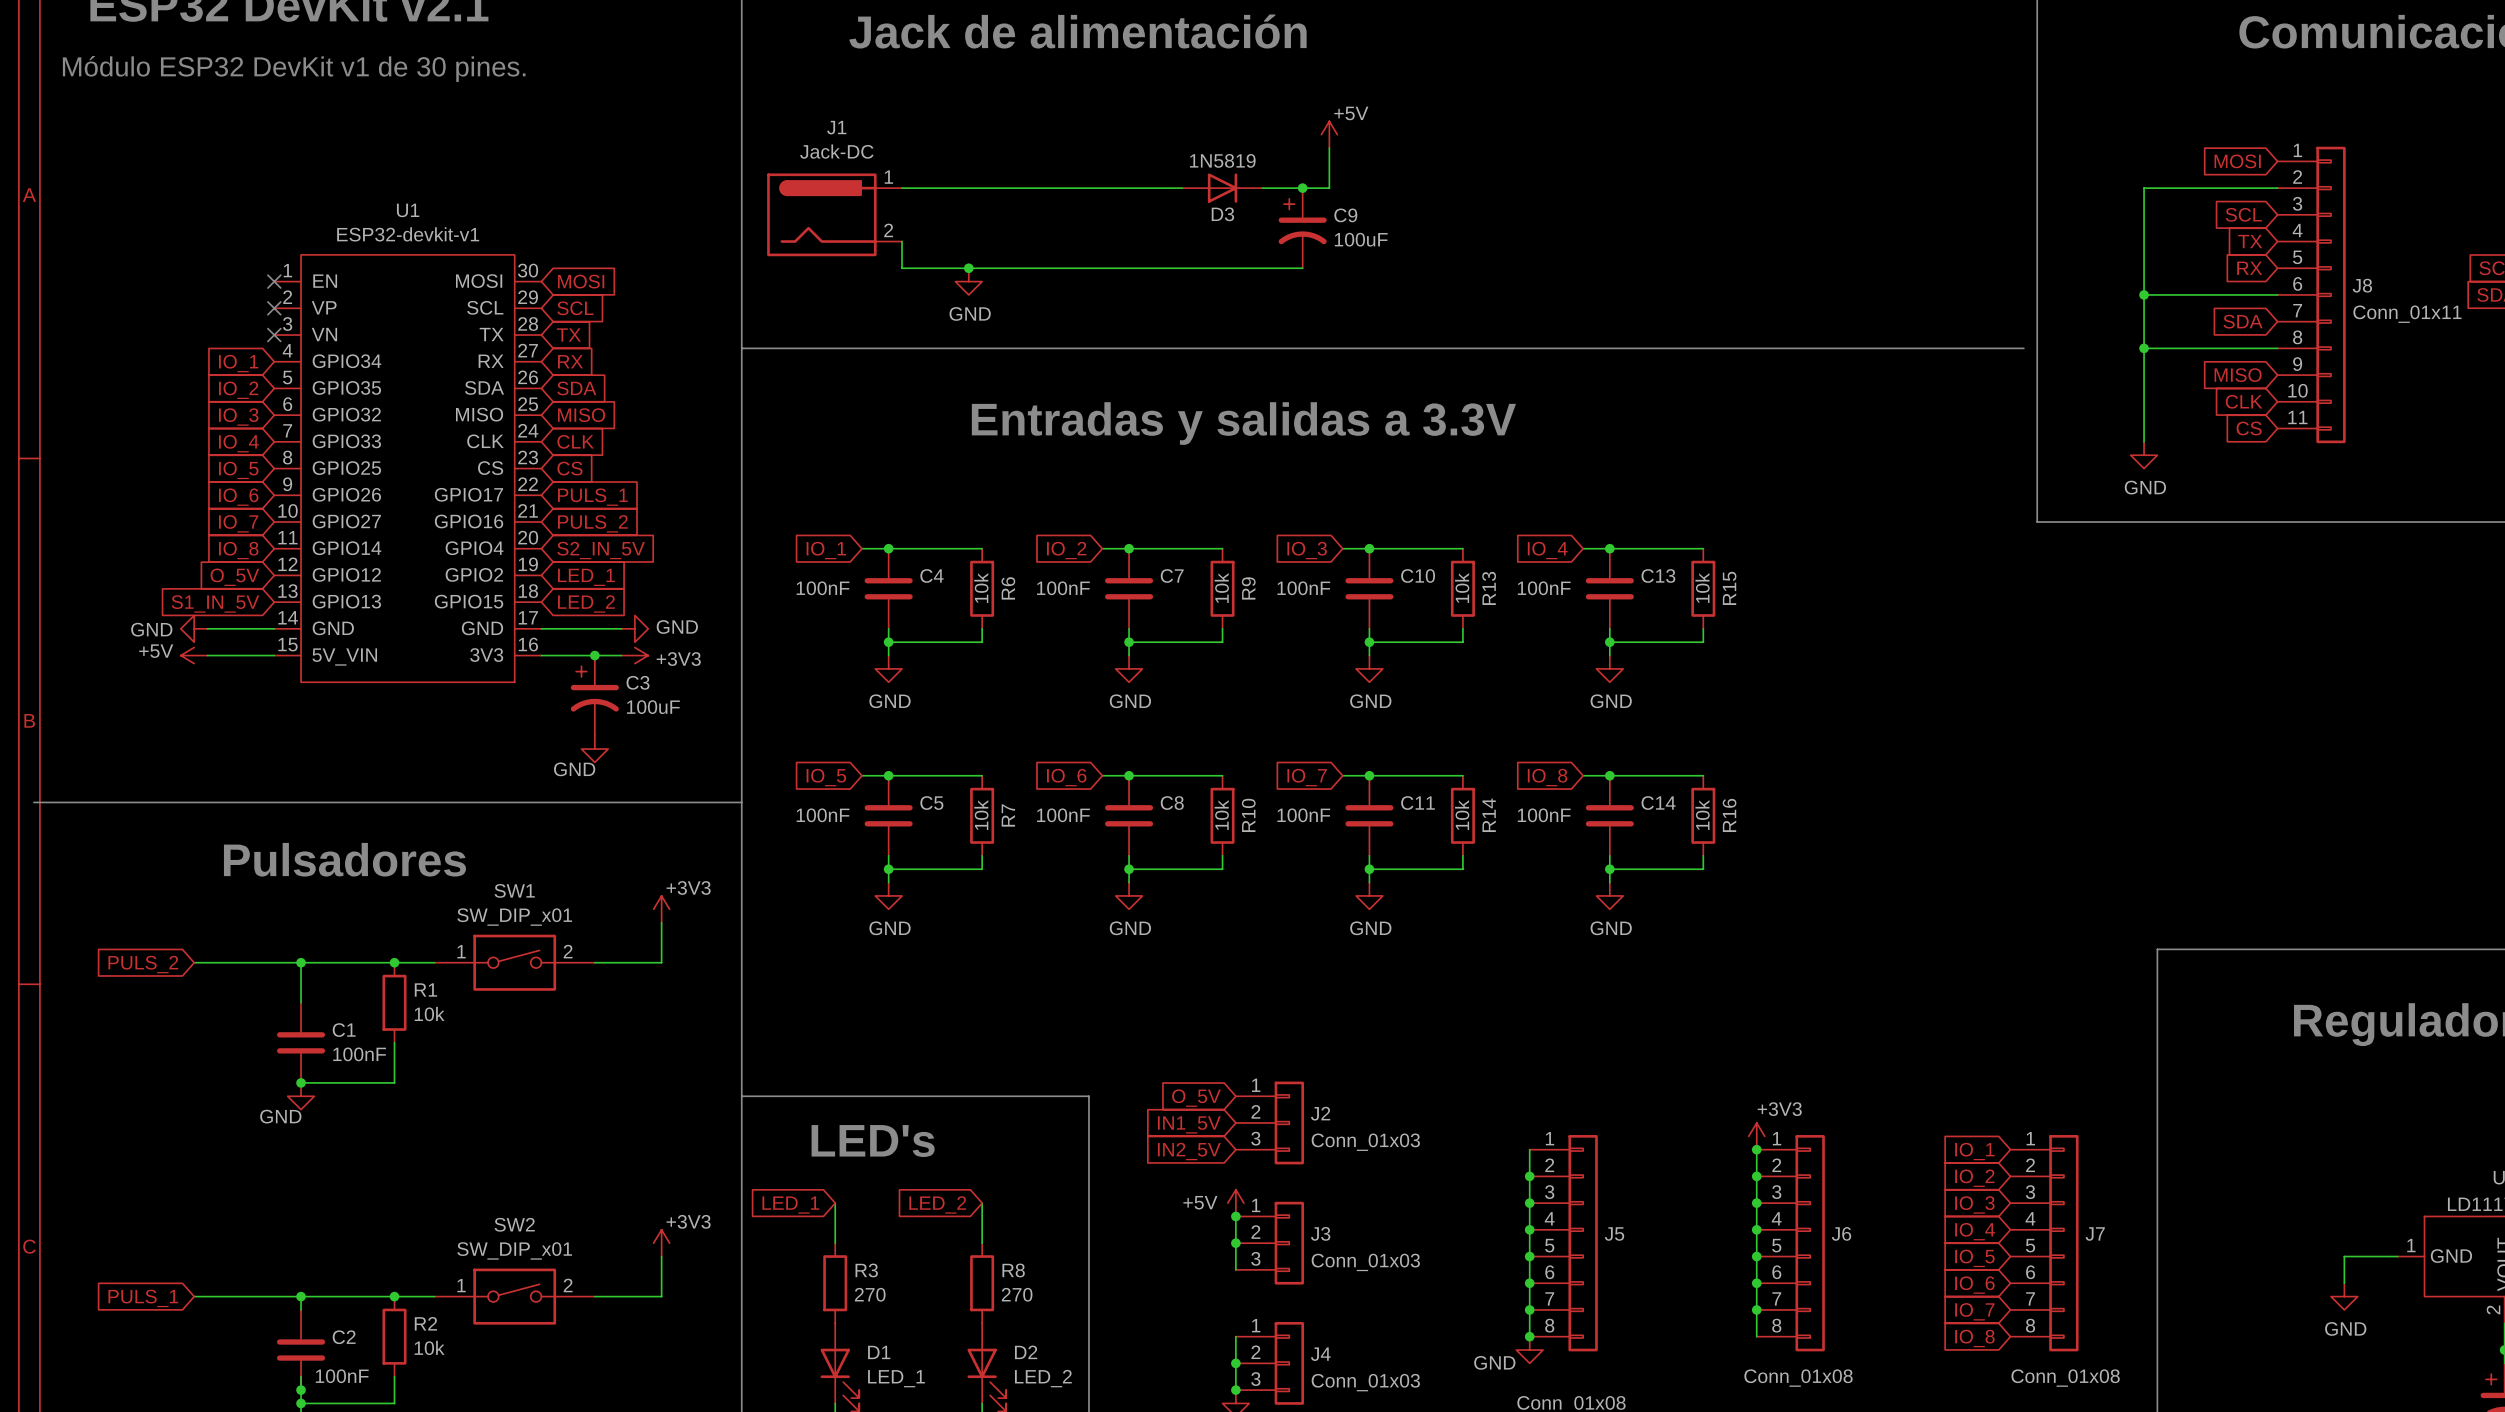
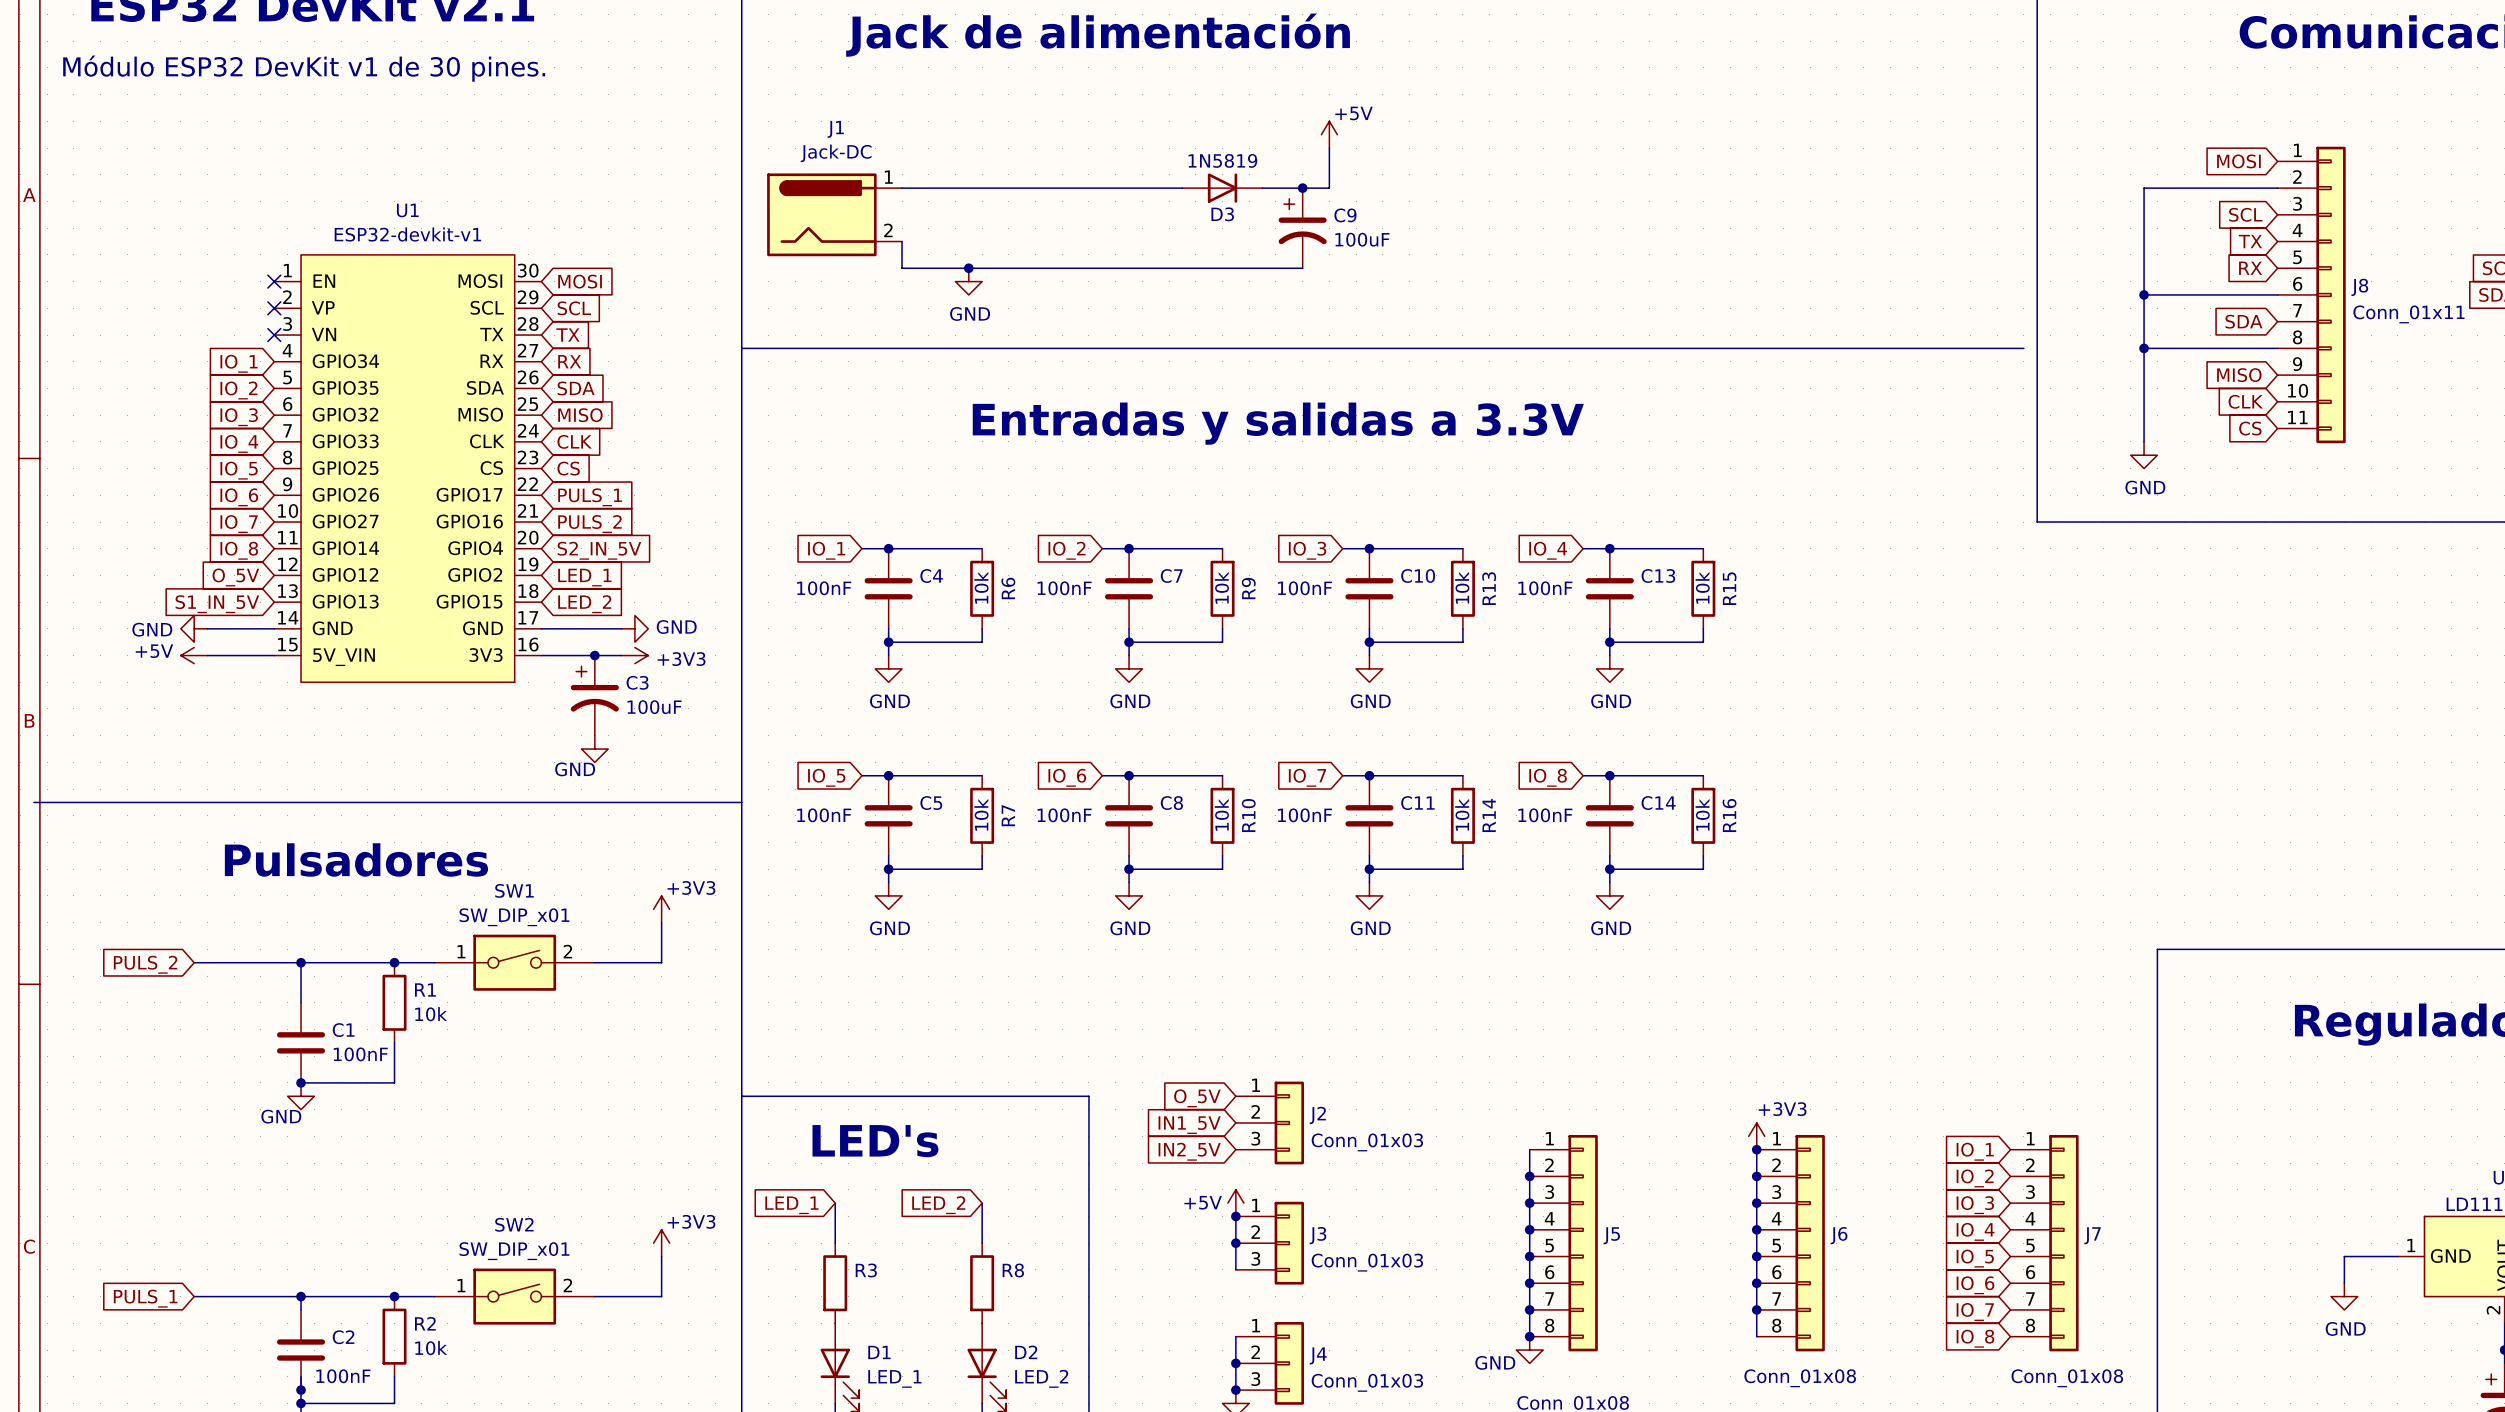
R3 value: 270 (870, 1294) -> none
R8 value: 270 (1017, 1294) -> none

